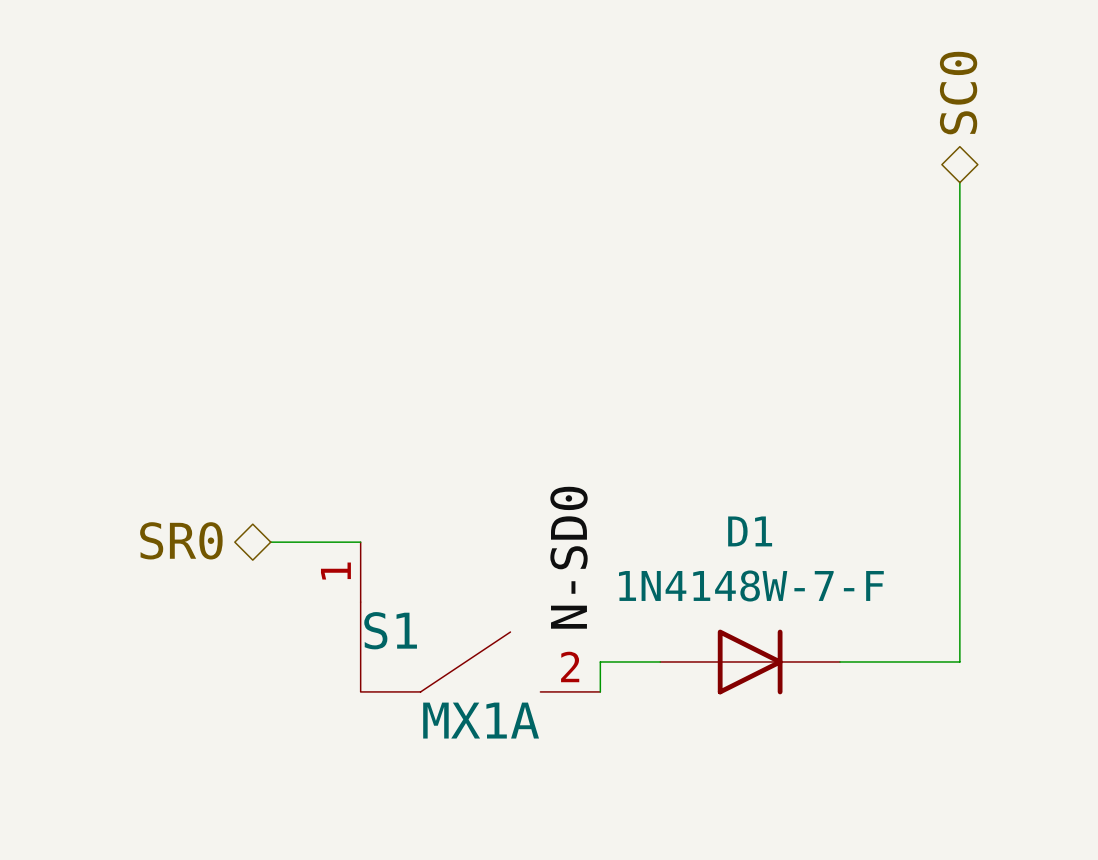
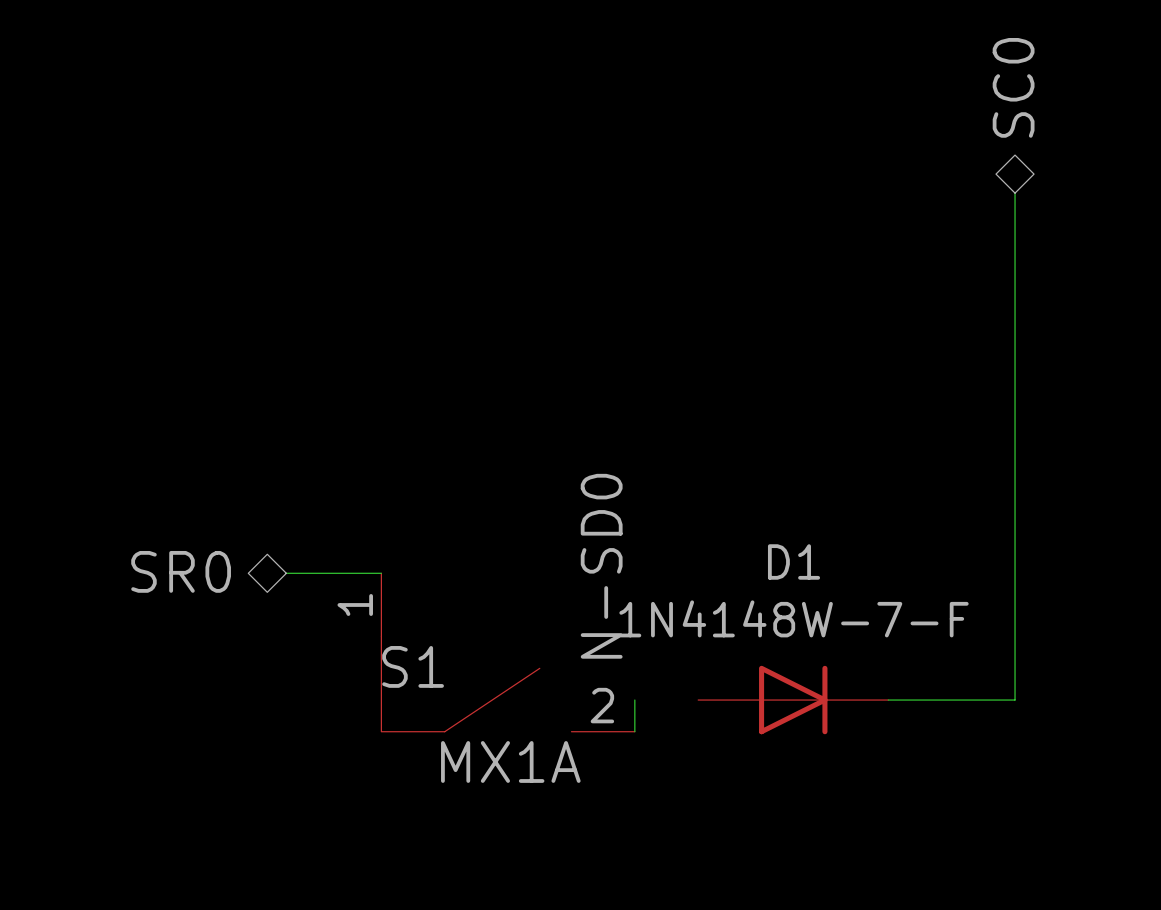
wire: (600, 661) (660, 661) -> none

